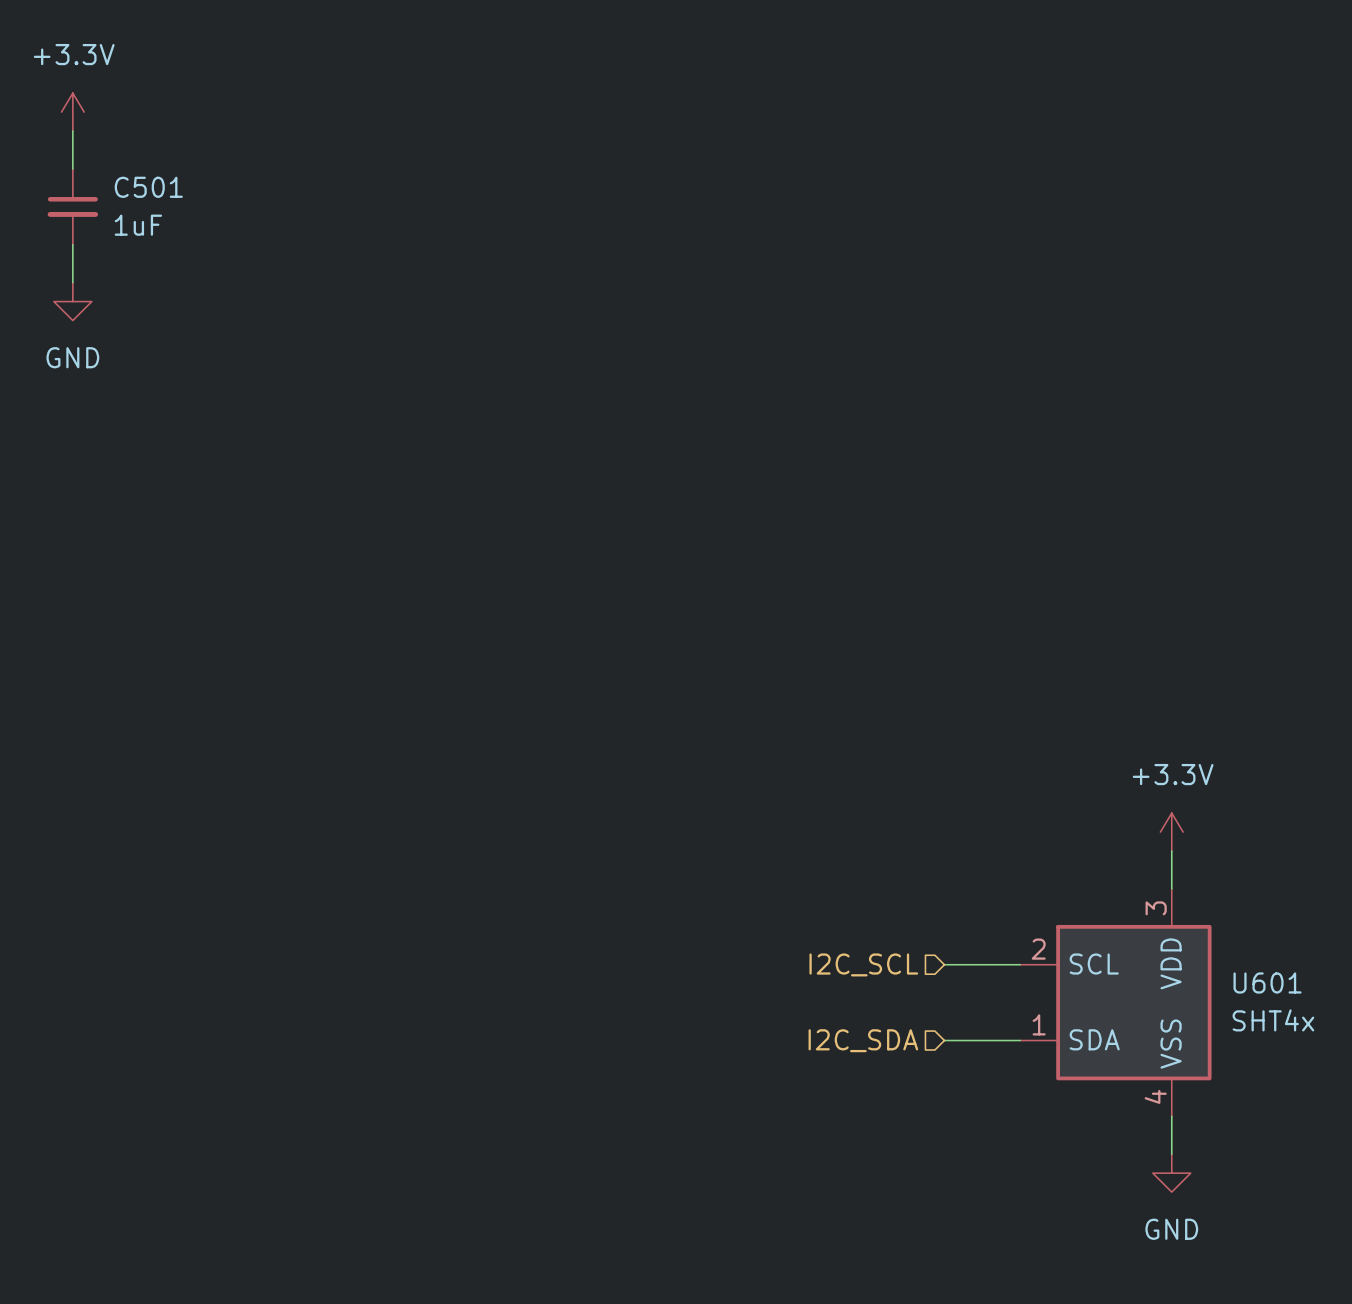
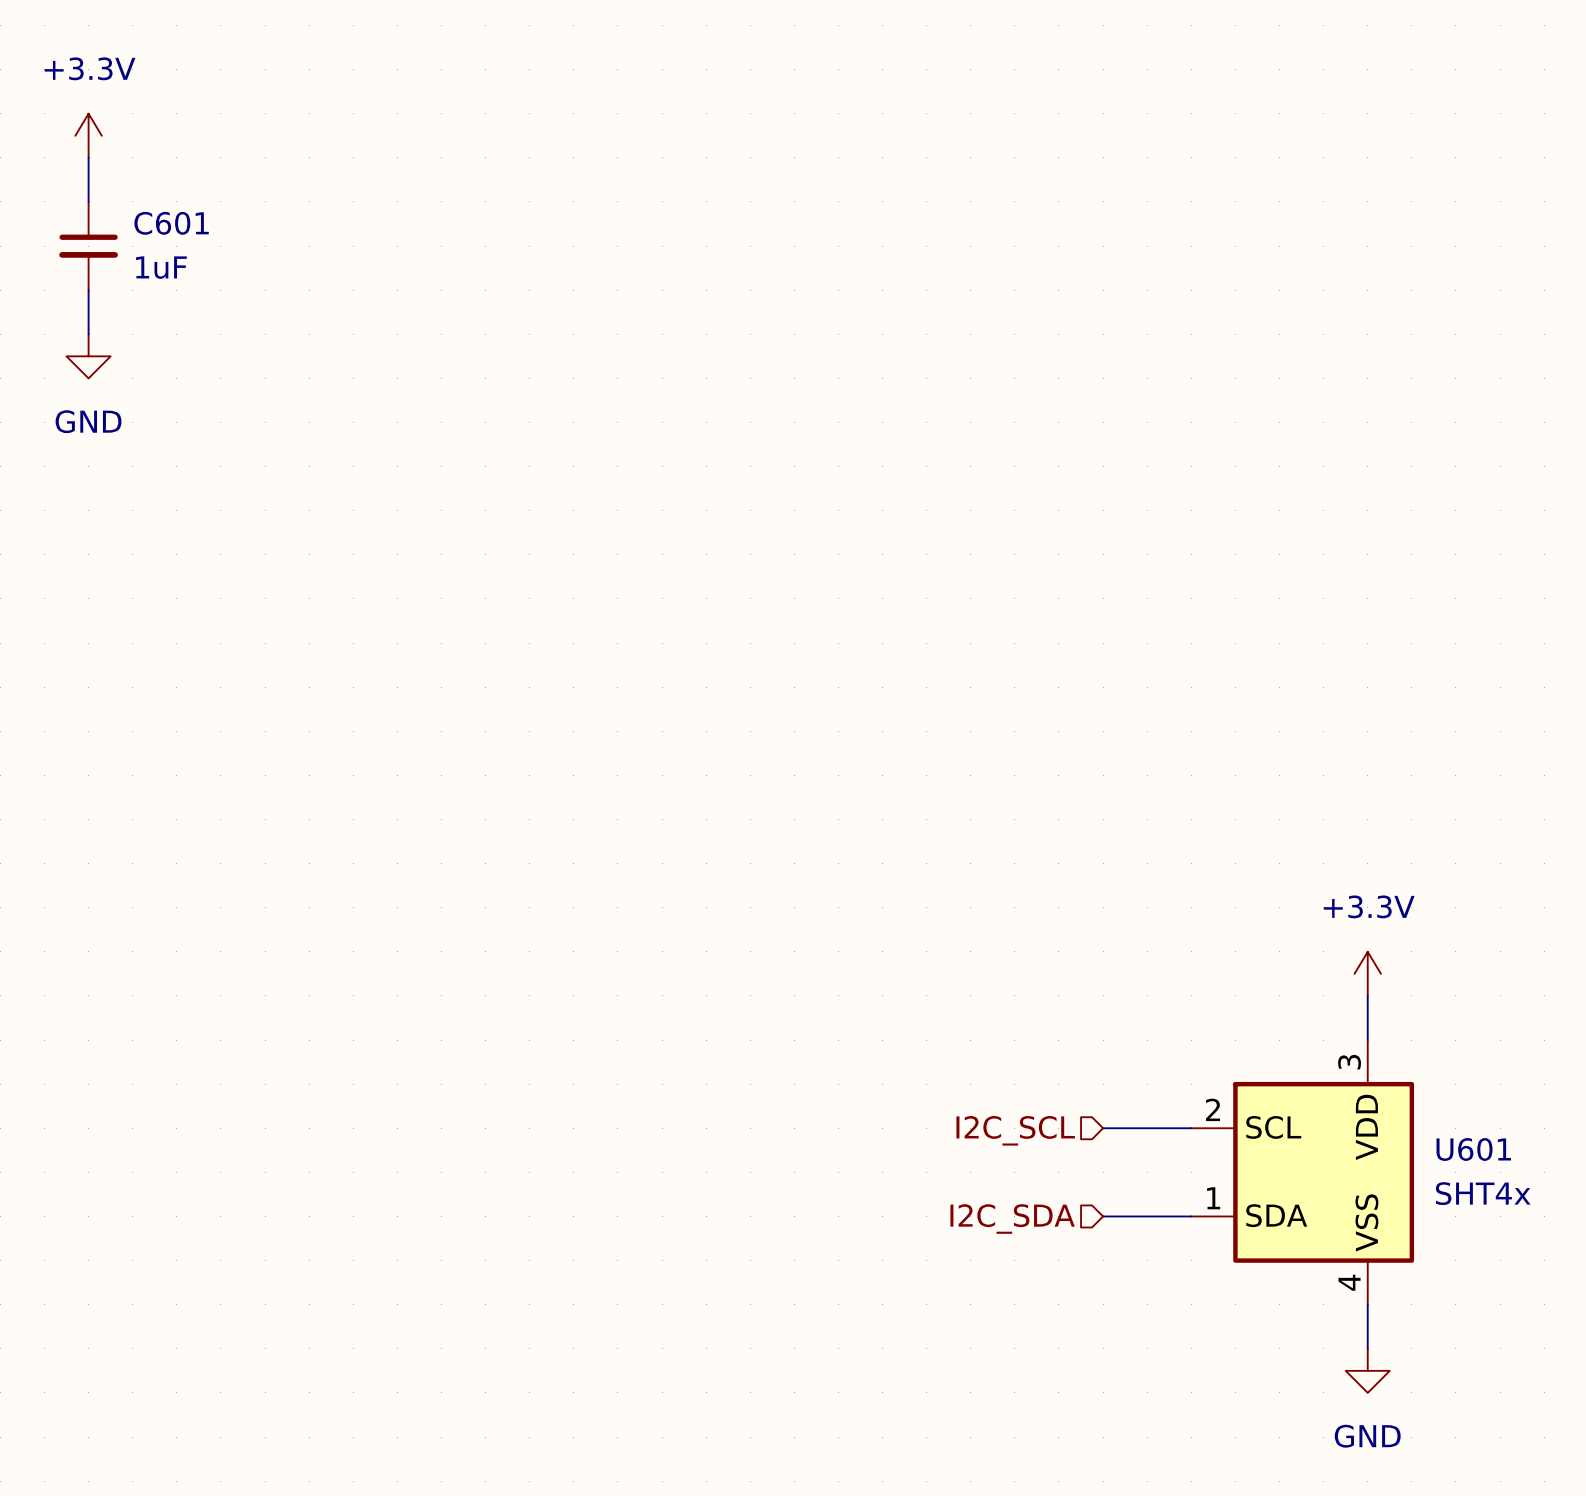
C501 name: C501 (148, 187) -> C601 (171, 223)

